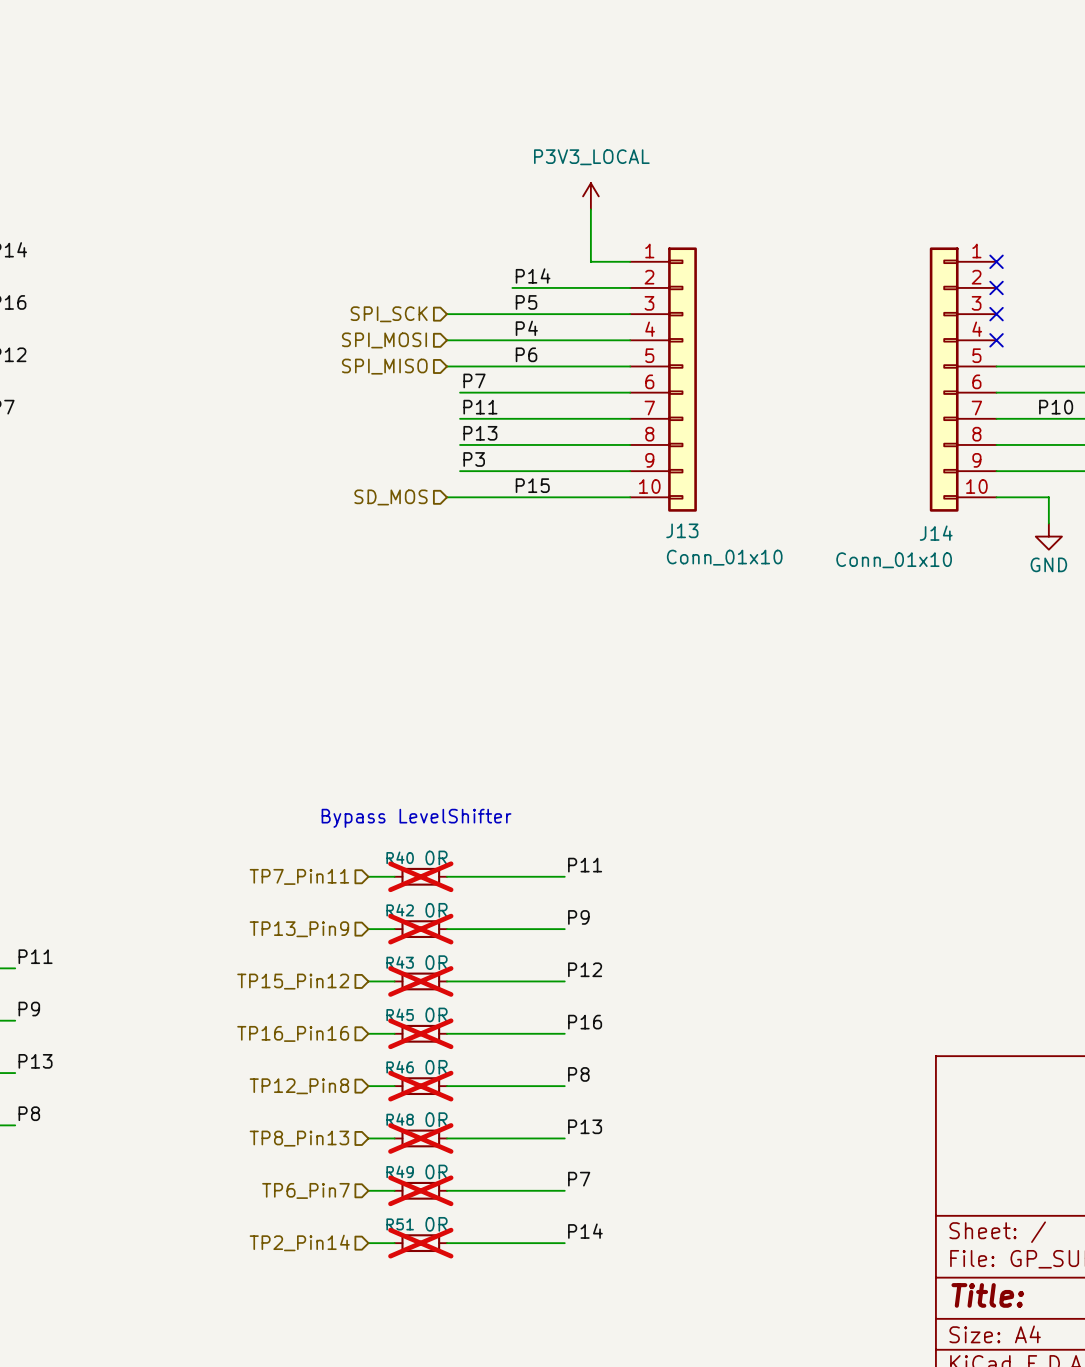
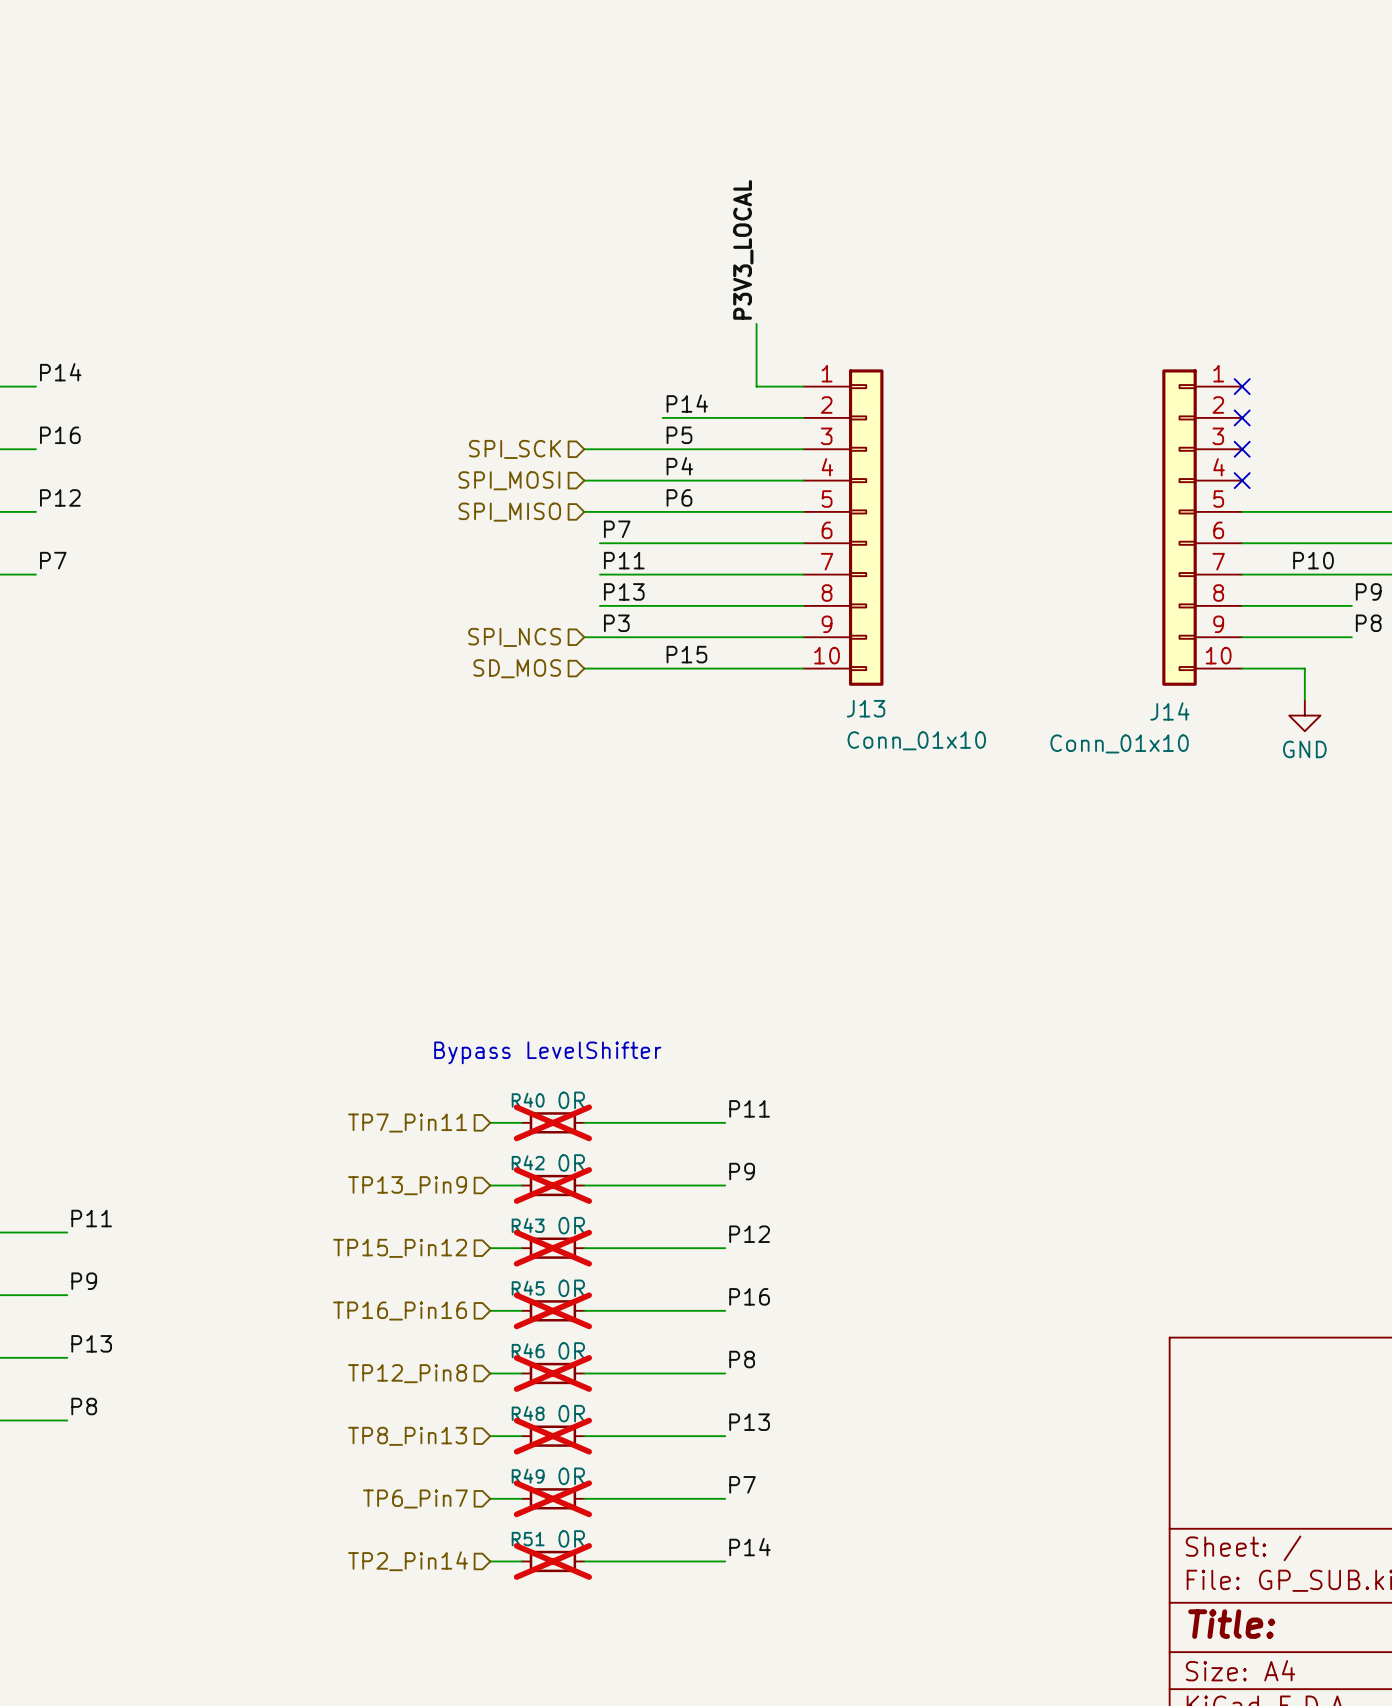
label: none -> P3V3_LOCAL (743, 249)
power symbol: P3V3_LOCAL (590, 196) -> none
hierarchical label: none -> SPI_NCS (514, 637)
wire: none -> (584, 637) (599, 637)

